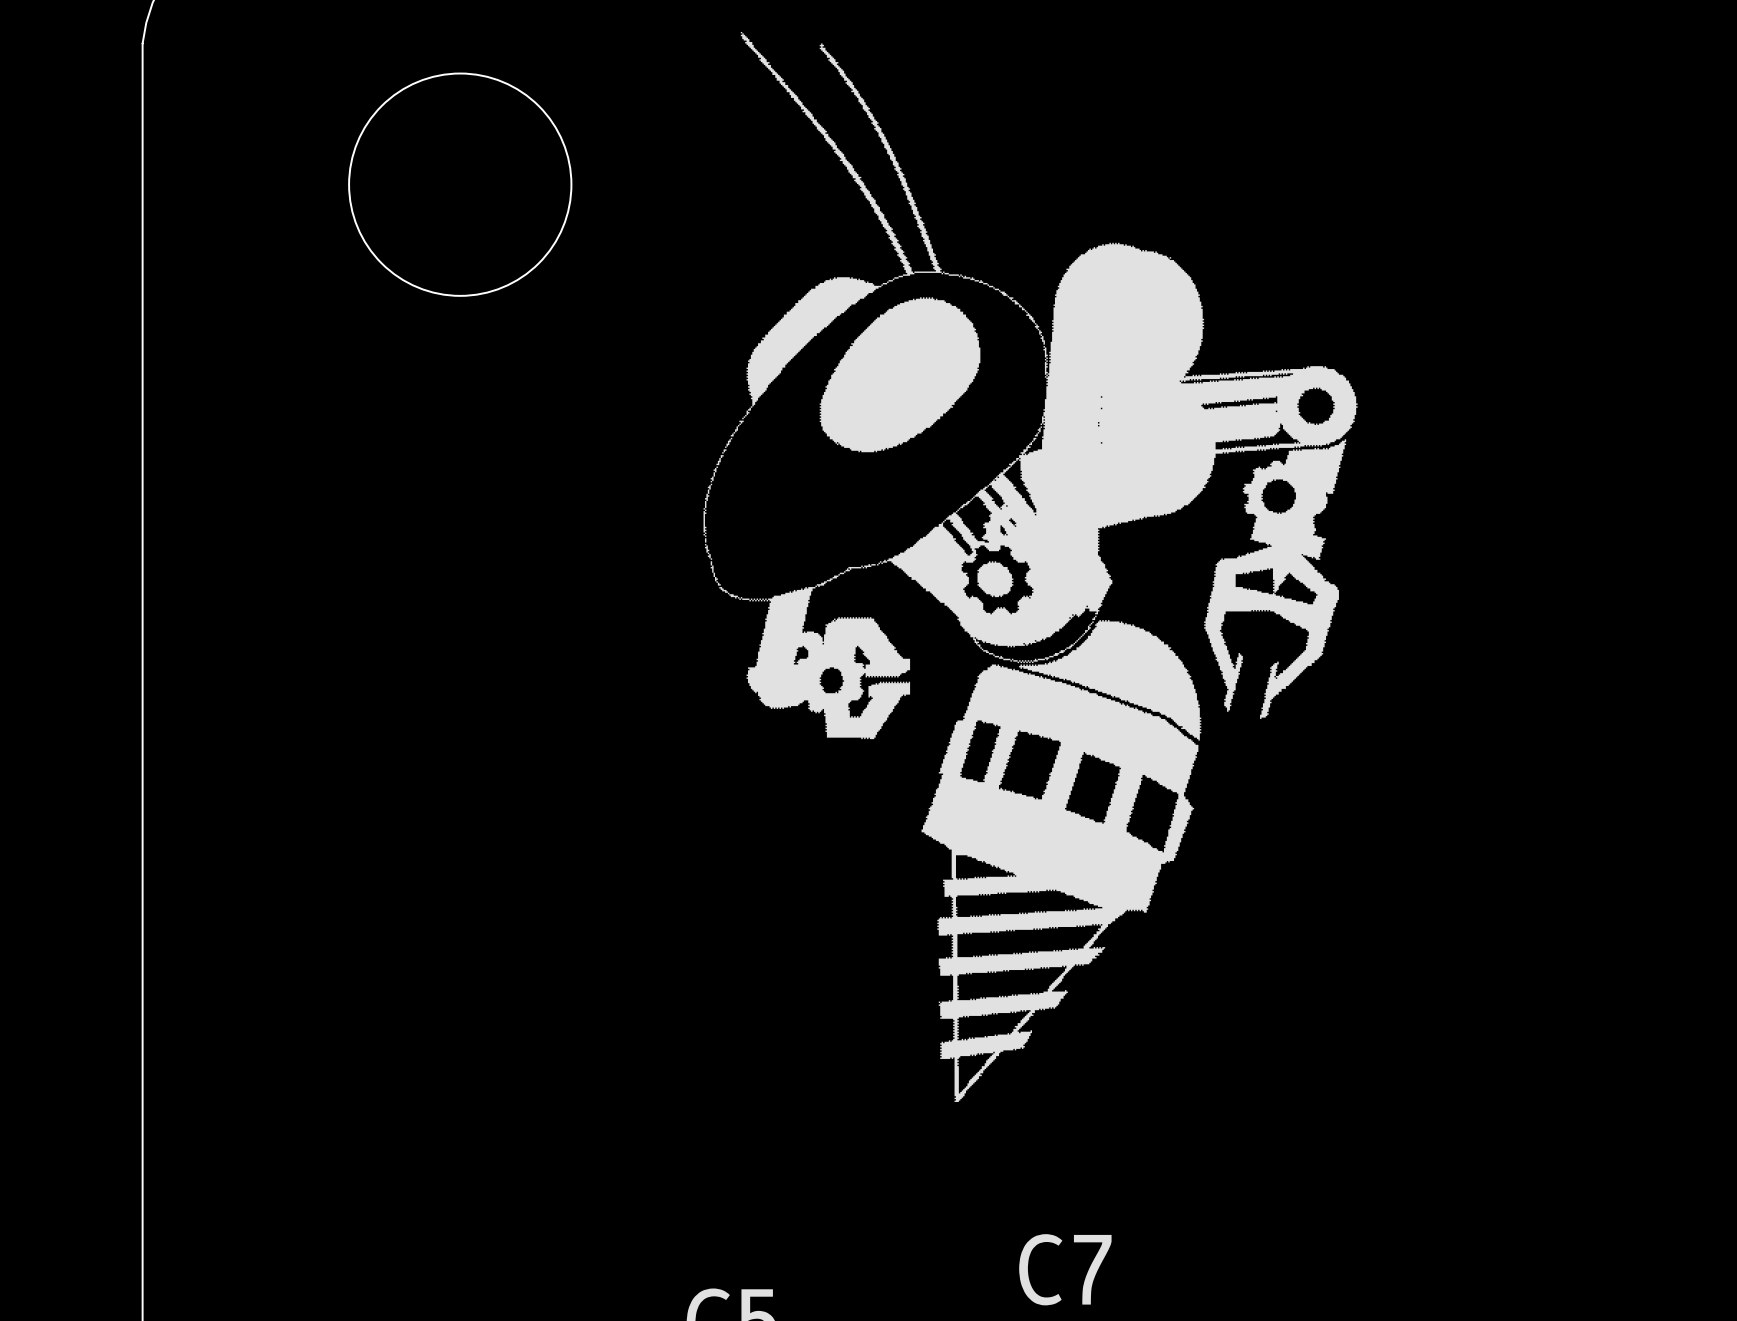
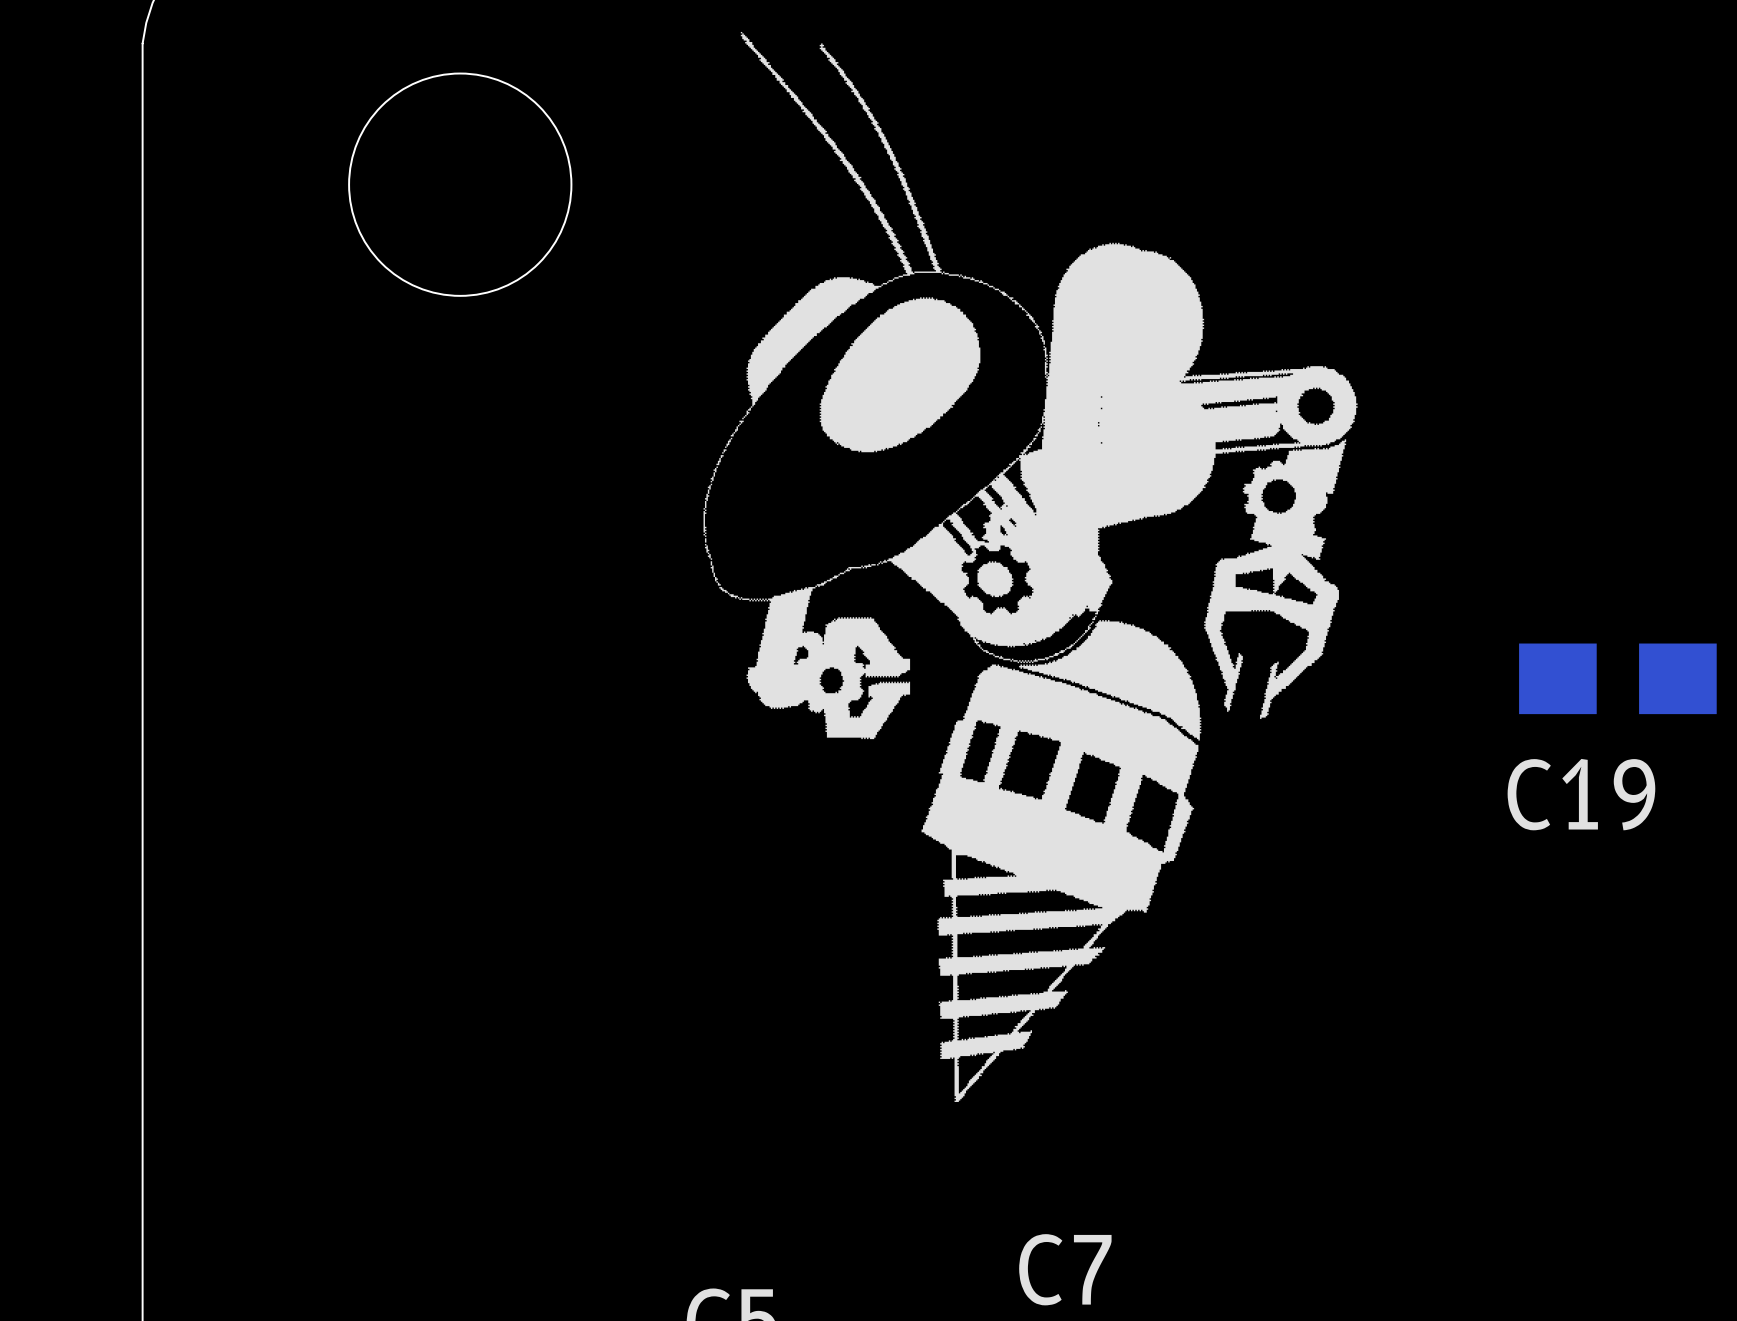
C19: none -> (1617, 678)

